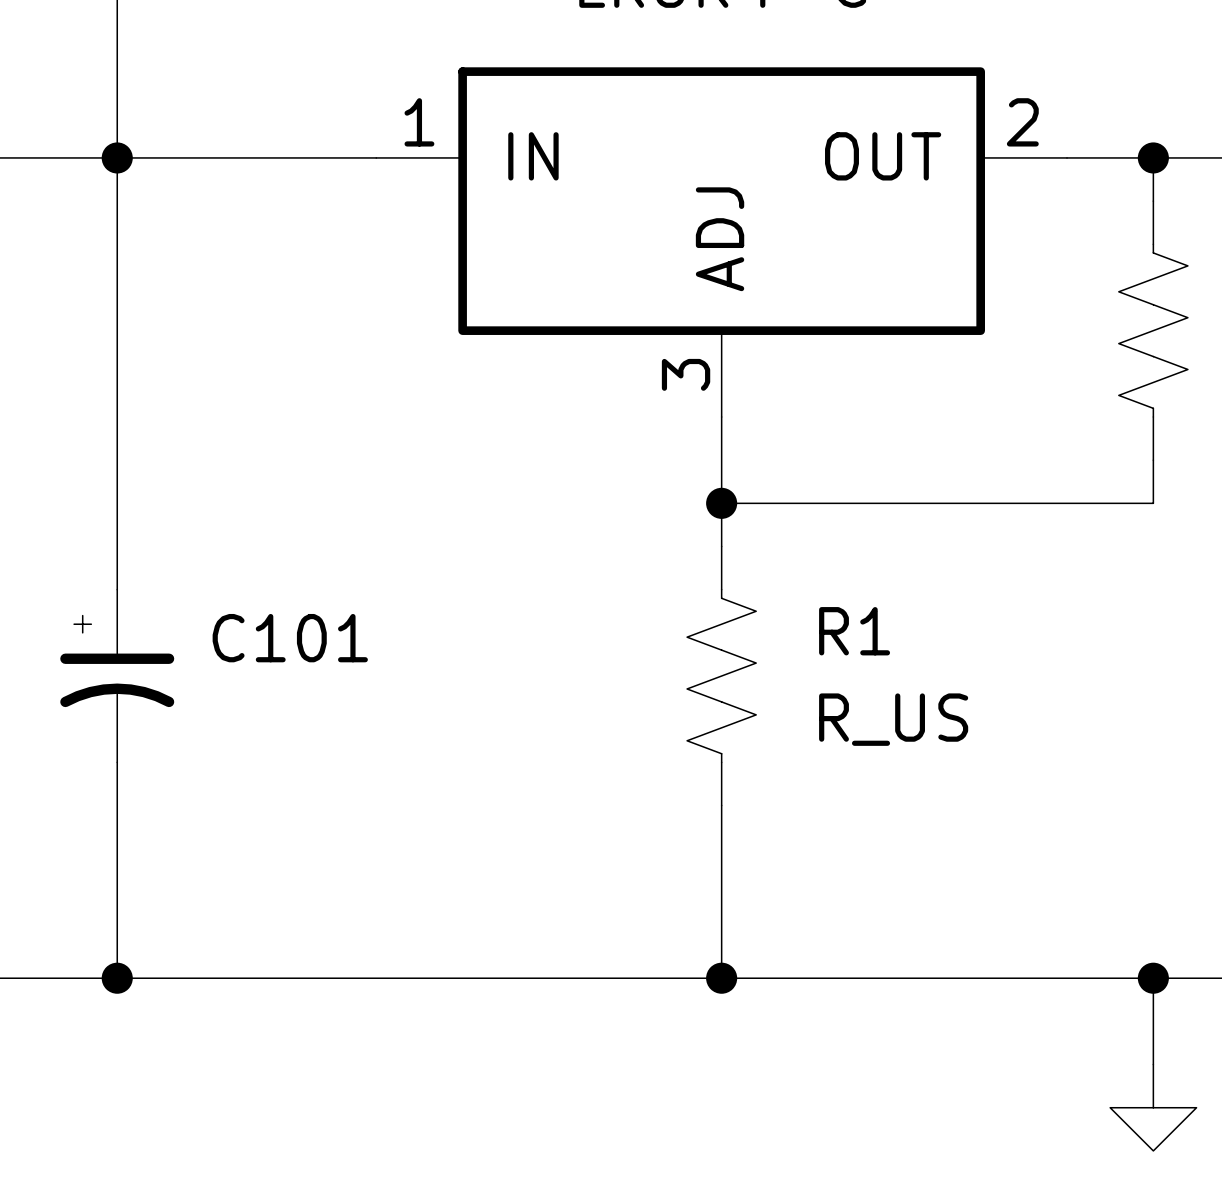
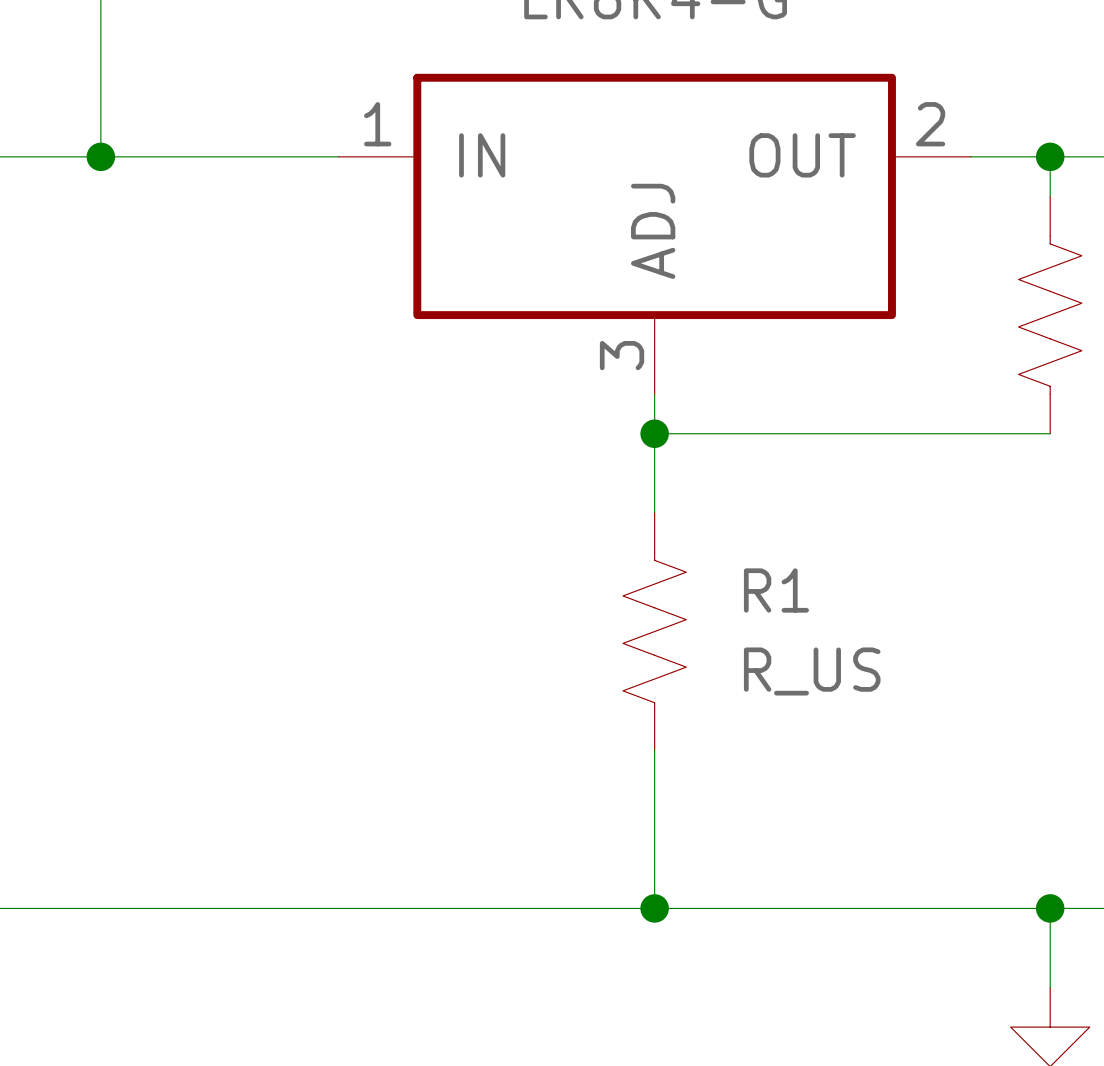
wire: (117, 157) (117, 589) -> none
wire: (1153, 460) (1153, 503) (721, 503) -> (1050, 433) (654, 433)
junction position: (721, 503) -> (654, 433)
C101: (117, 676) -> none
wire: (117, 762) (117, 978) -> none
junction: (117, 978) -> none

